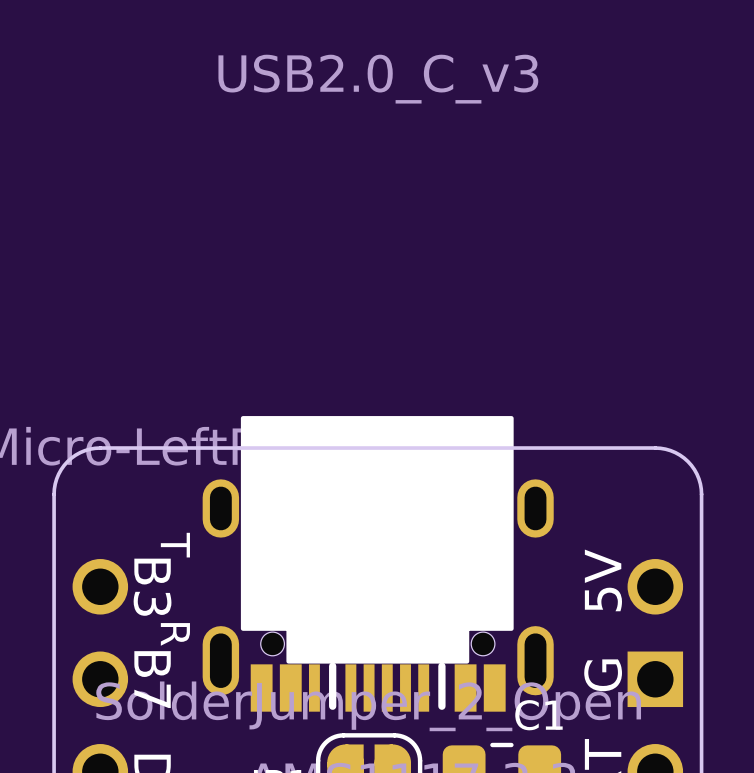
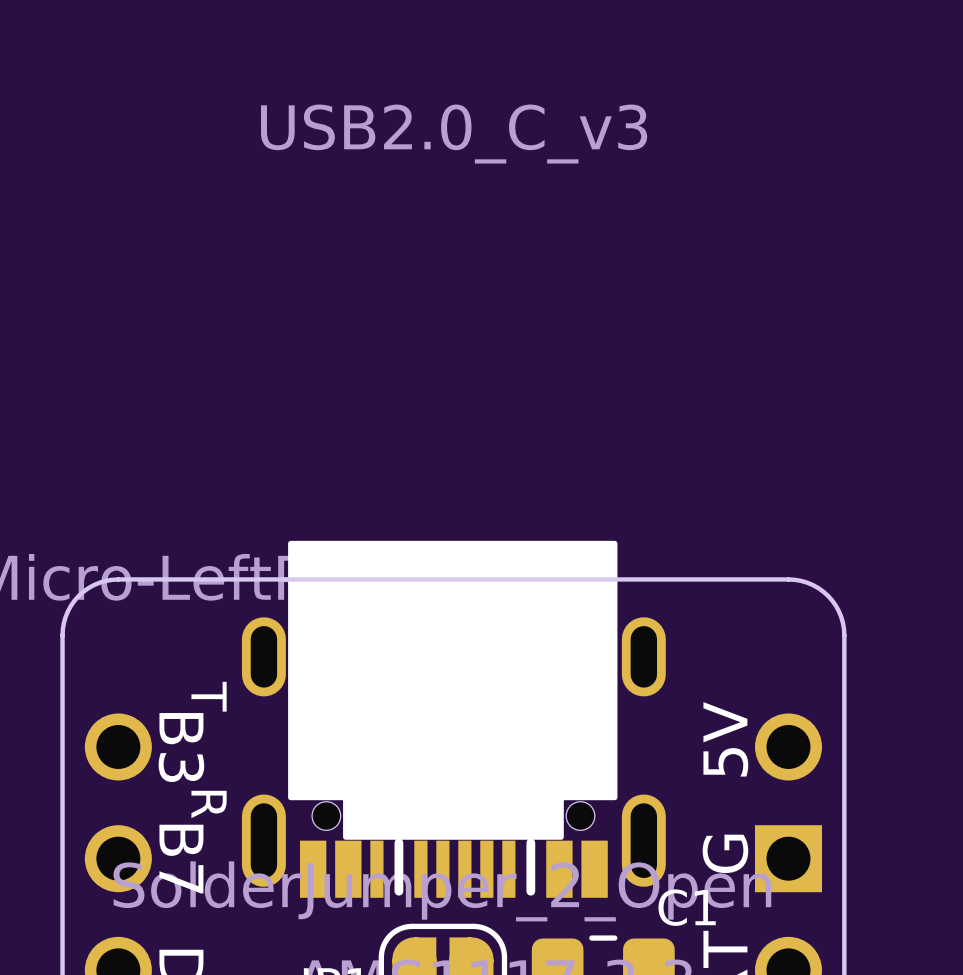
part footprint: [202, 416, 554, 712] -> [241, 540, 666, 898]
C1 name position: C1 (538, 715) -> C1 (687, 907)

